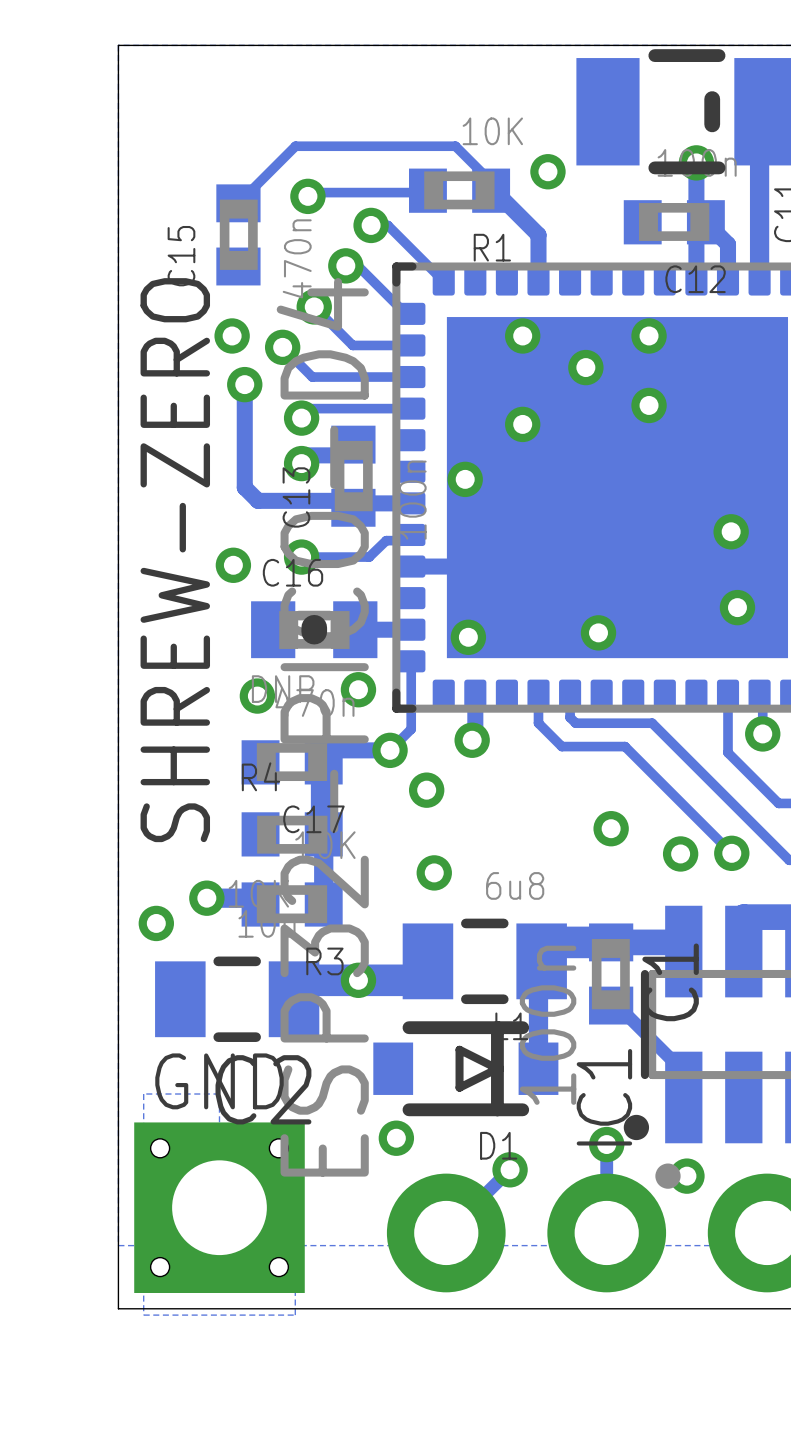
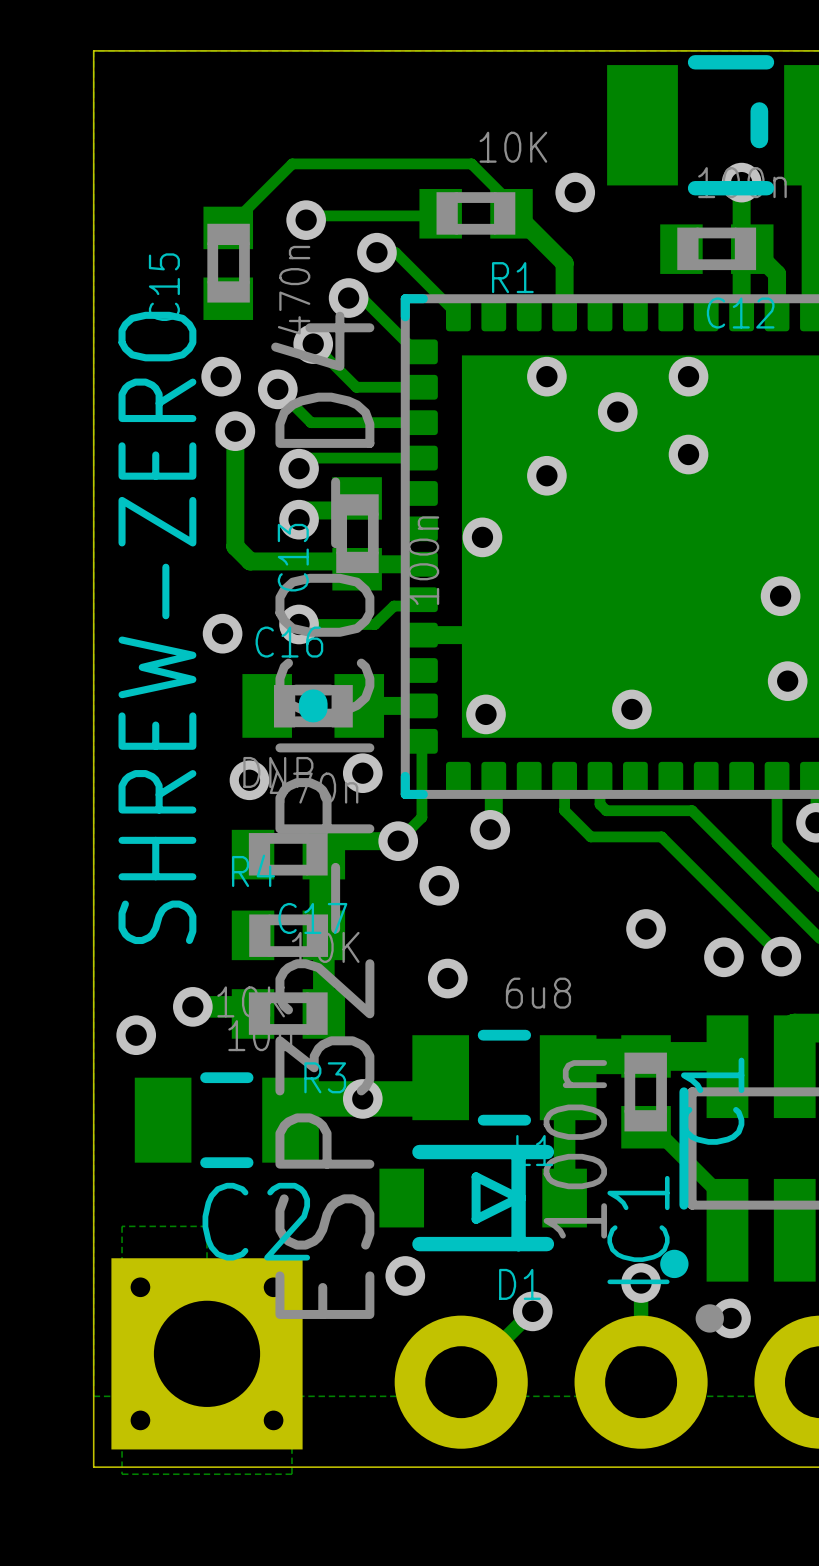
text: GND (219, 1081) -> none

